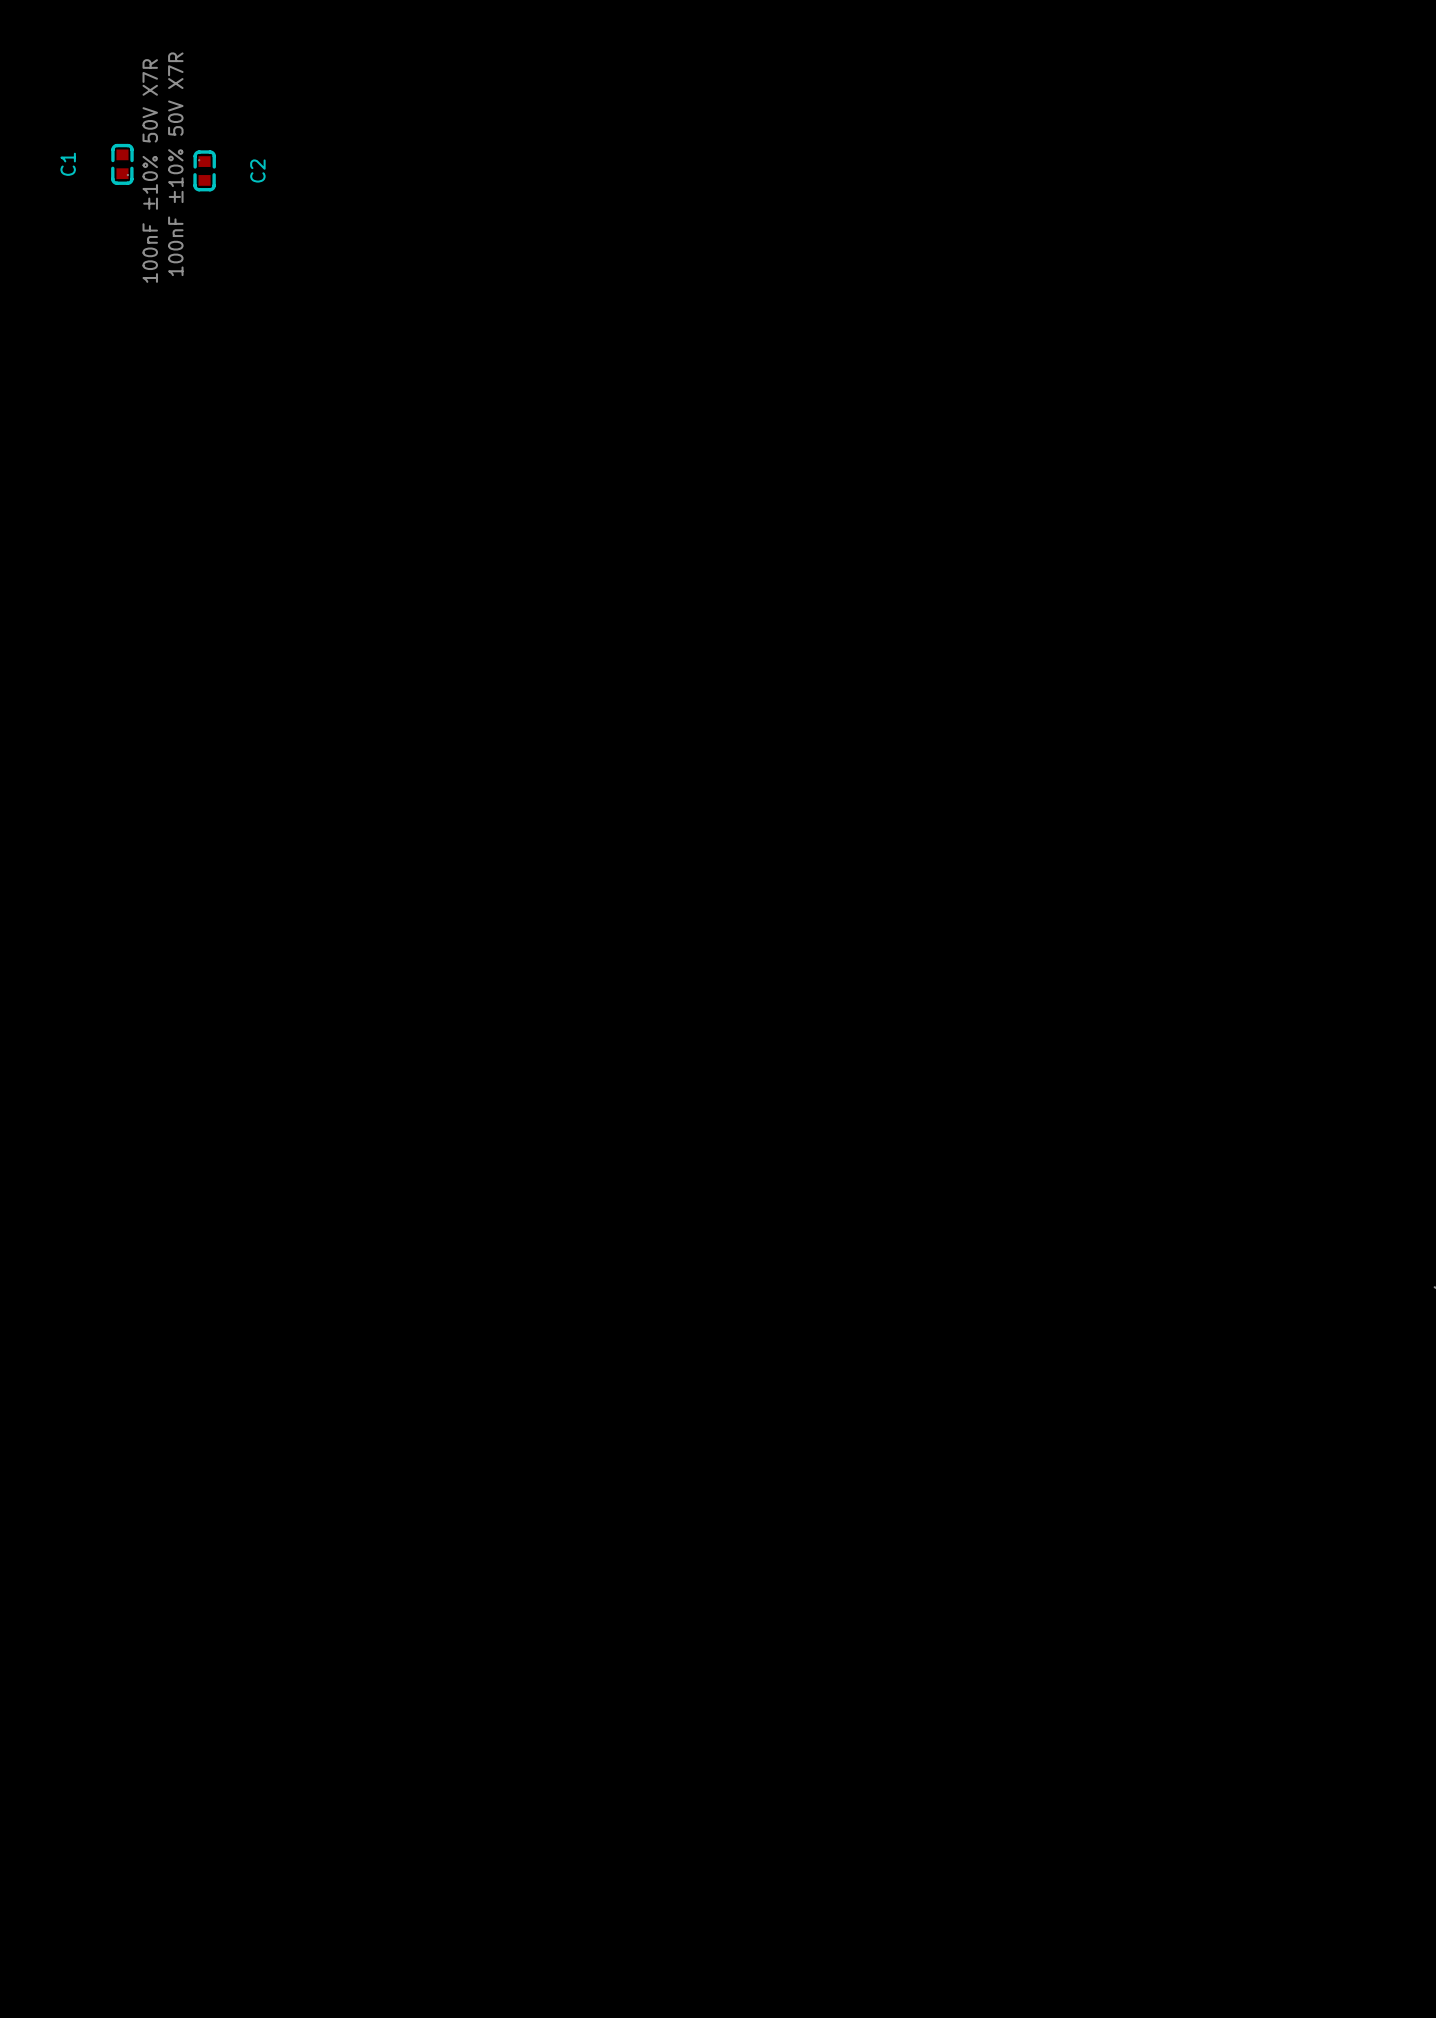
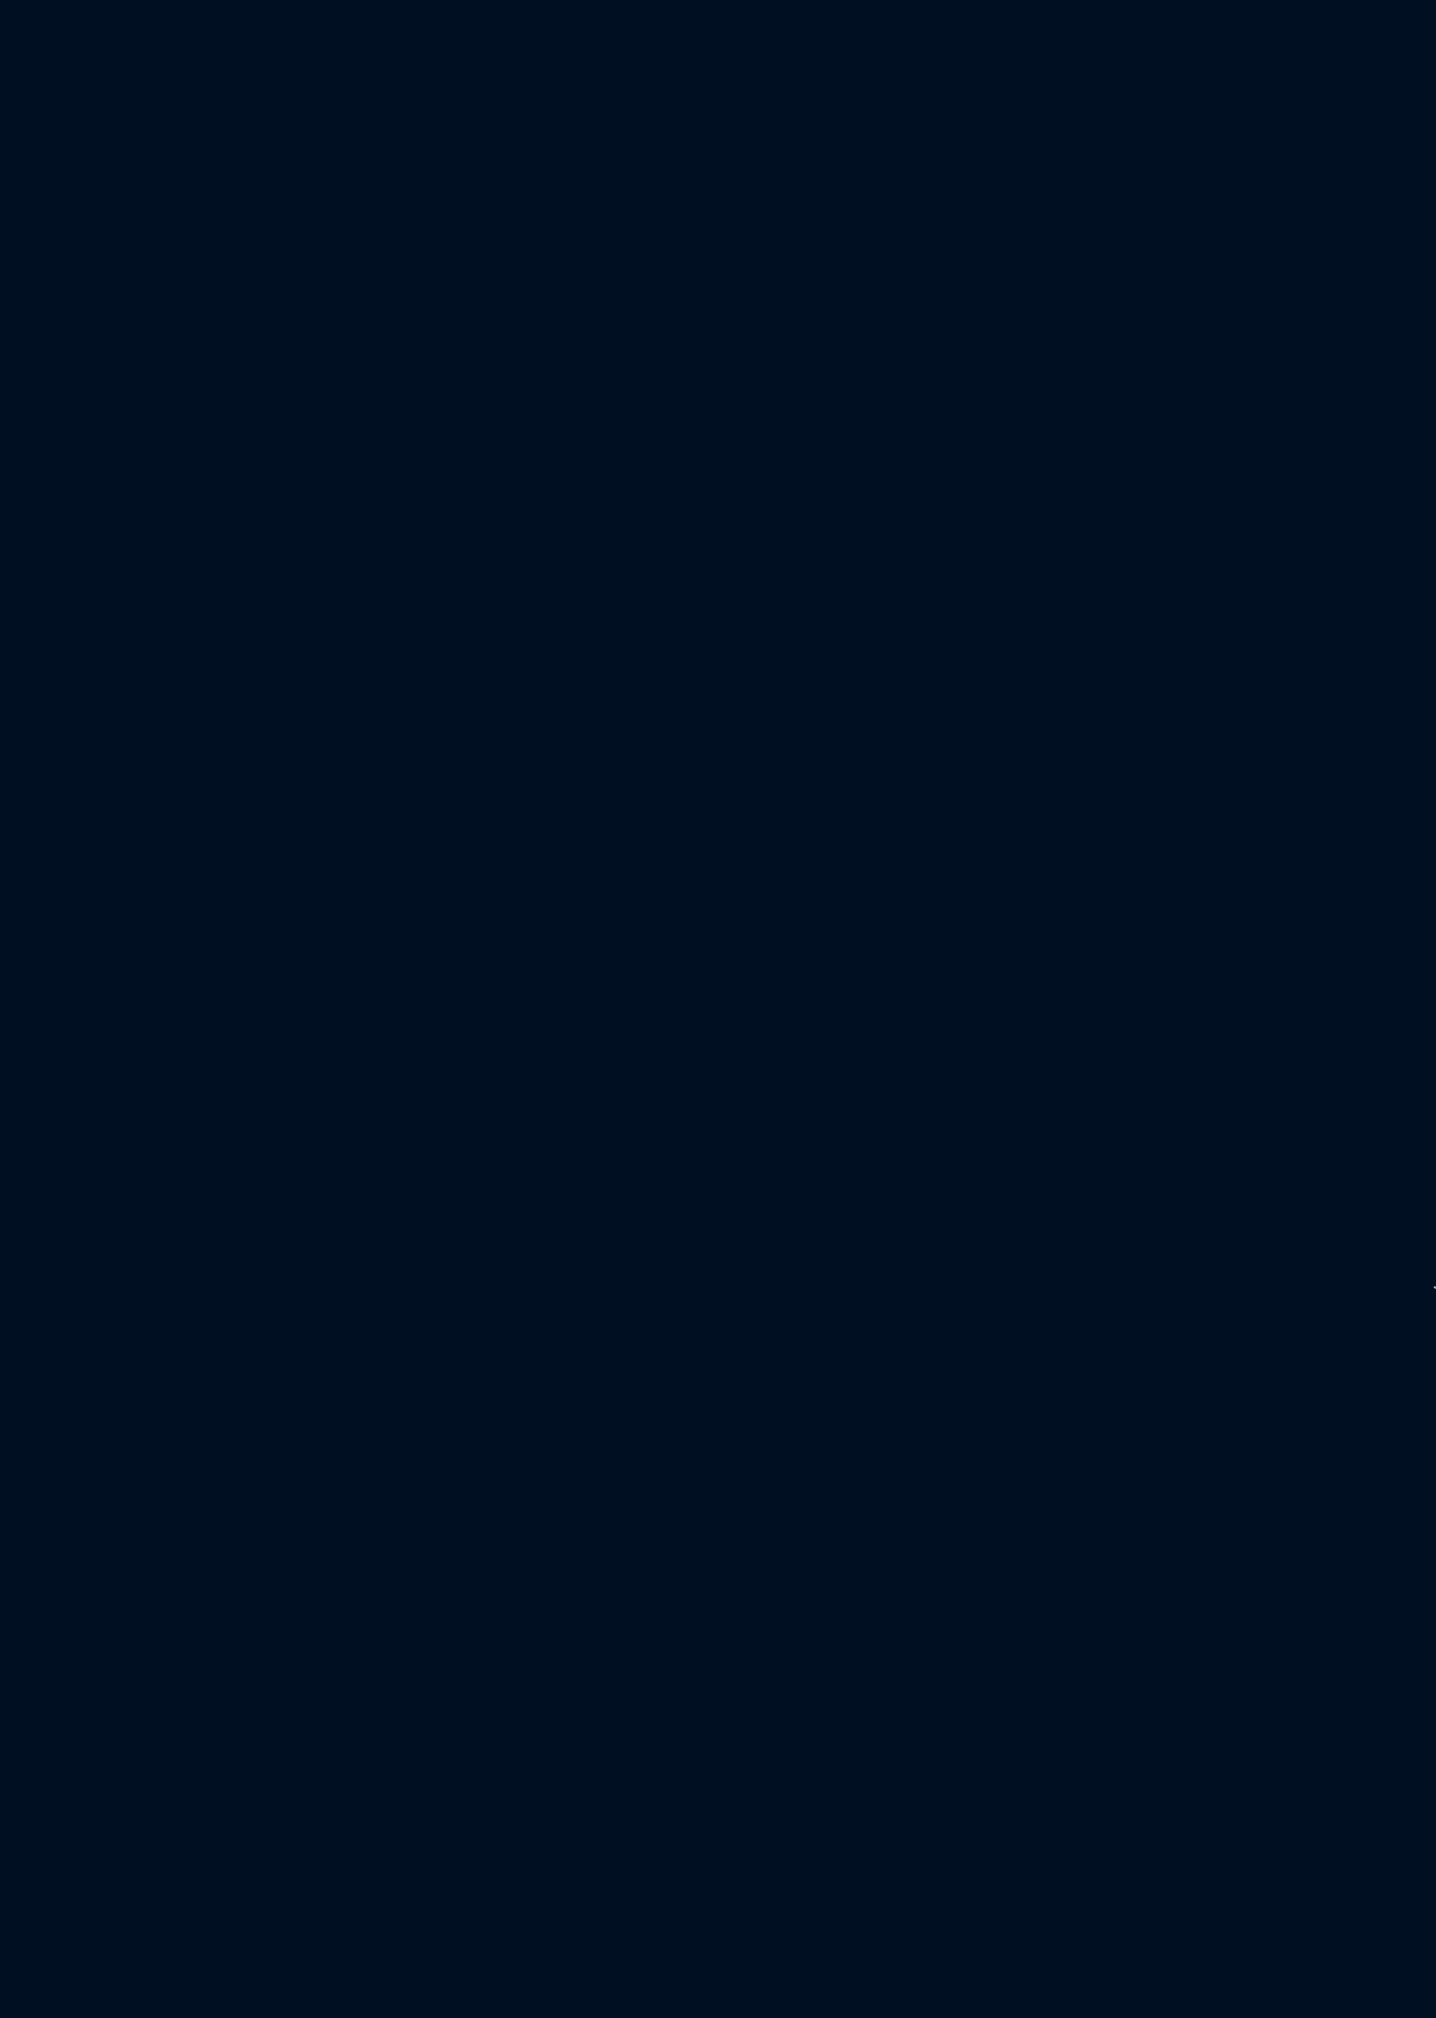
C1: 100nF ±10% 50V X7R (122, 164) -> none
C2: 100nF ±10% 50V X7R (204, 170) -> none

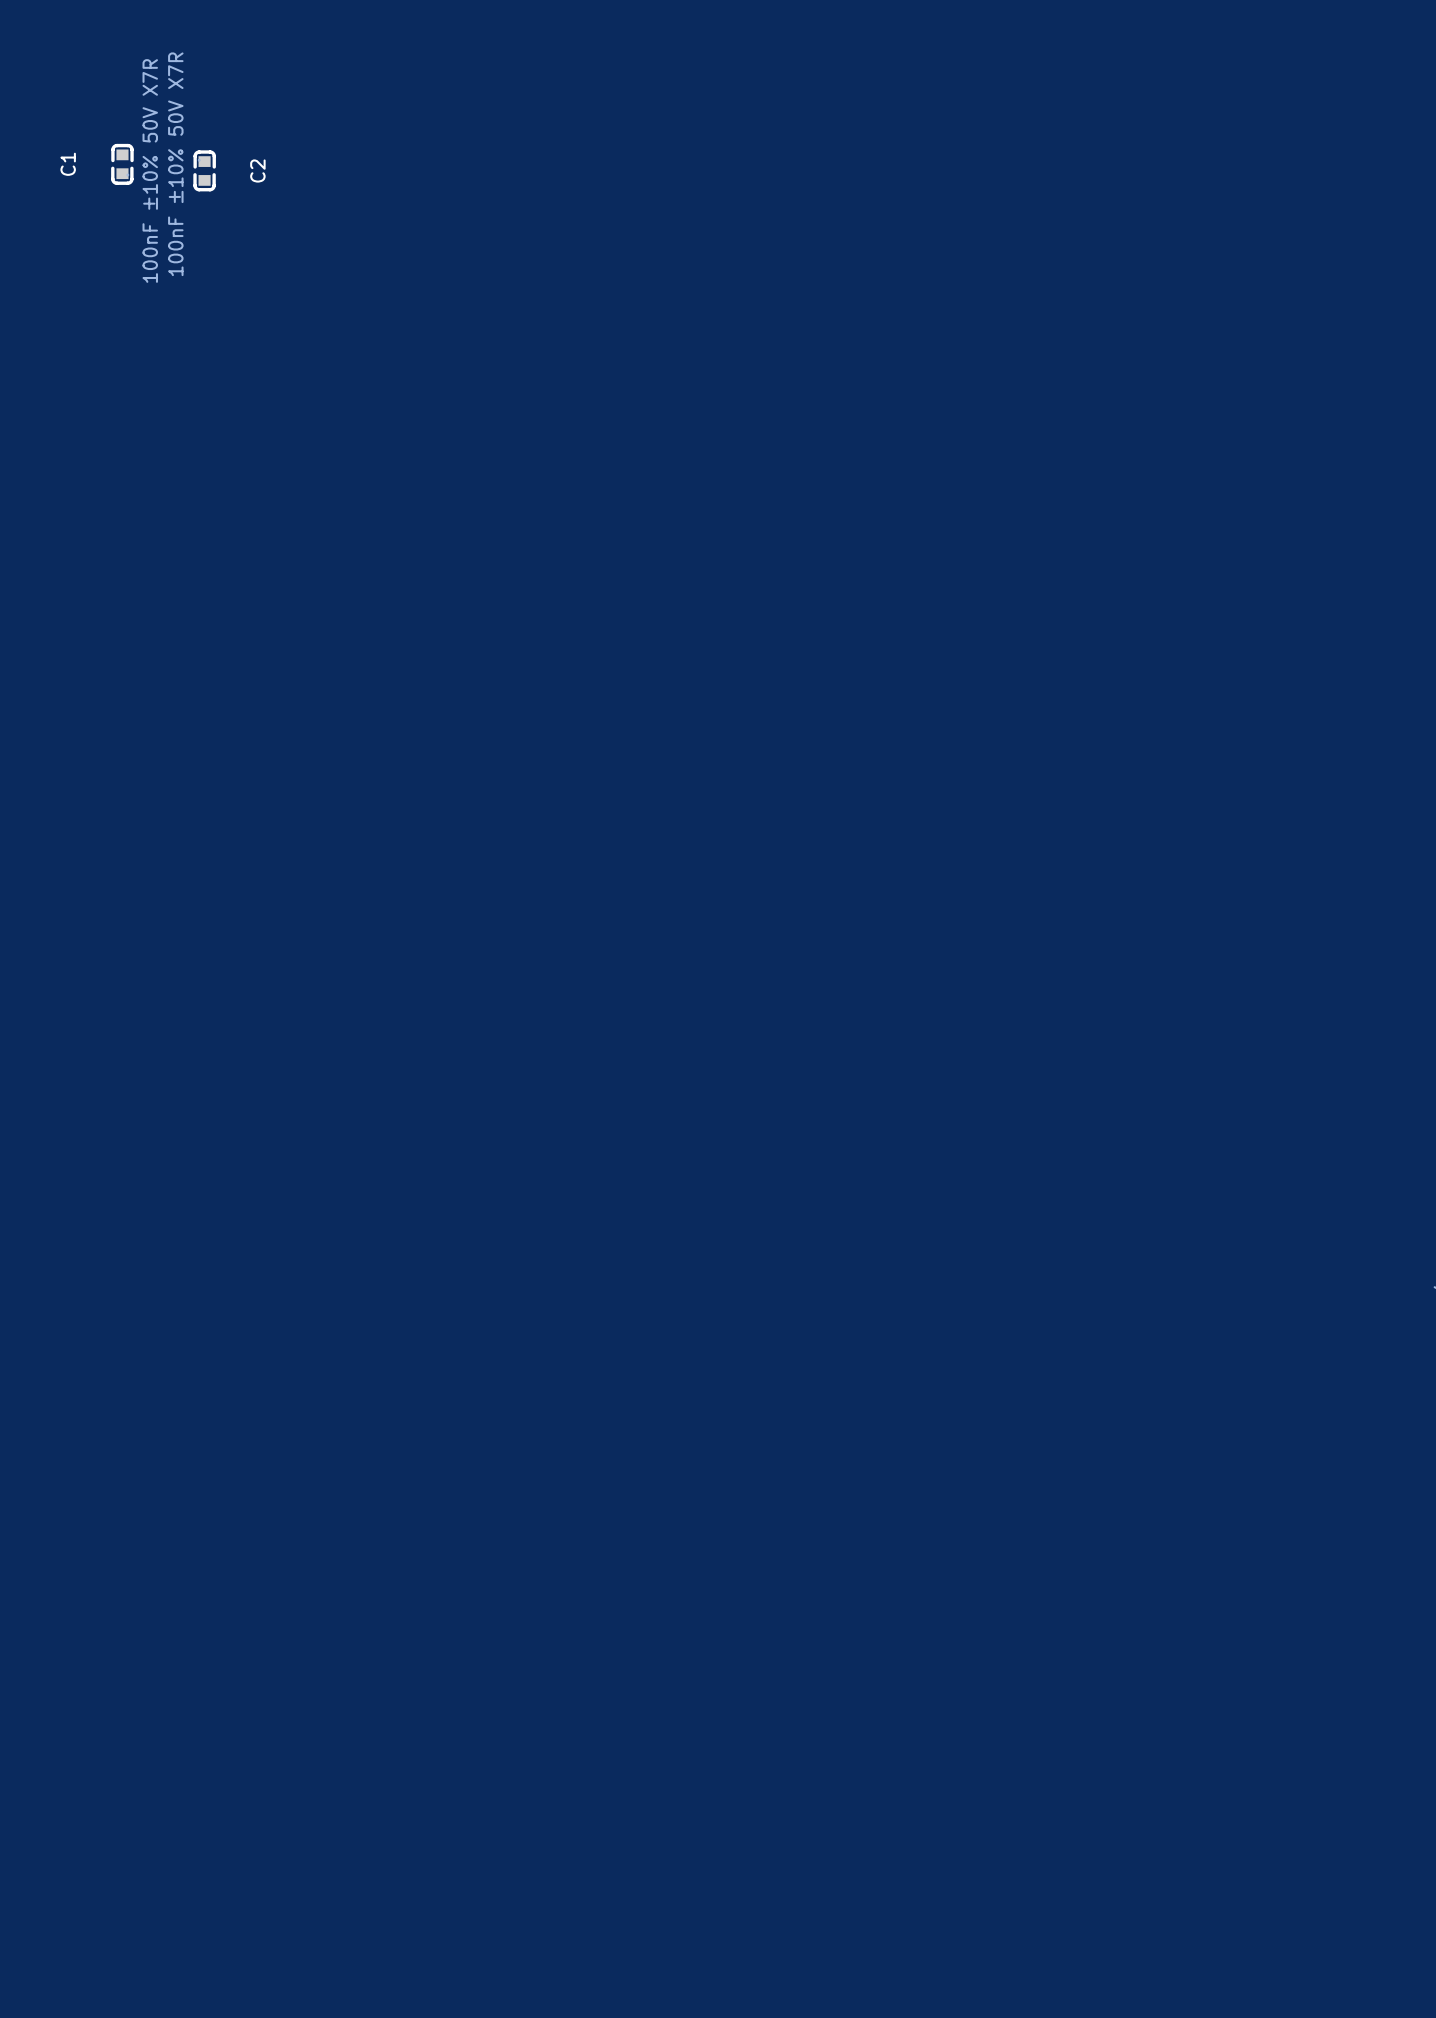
C1: none -> 100nF ±10% 50V X7R (122, 164)
C2: none -> 100nF ±10% 50V X7R (204, 170)

